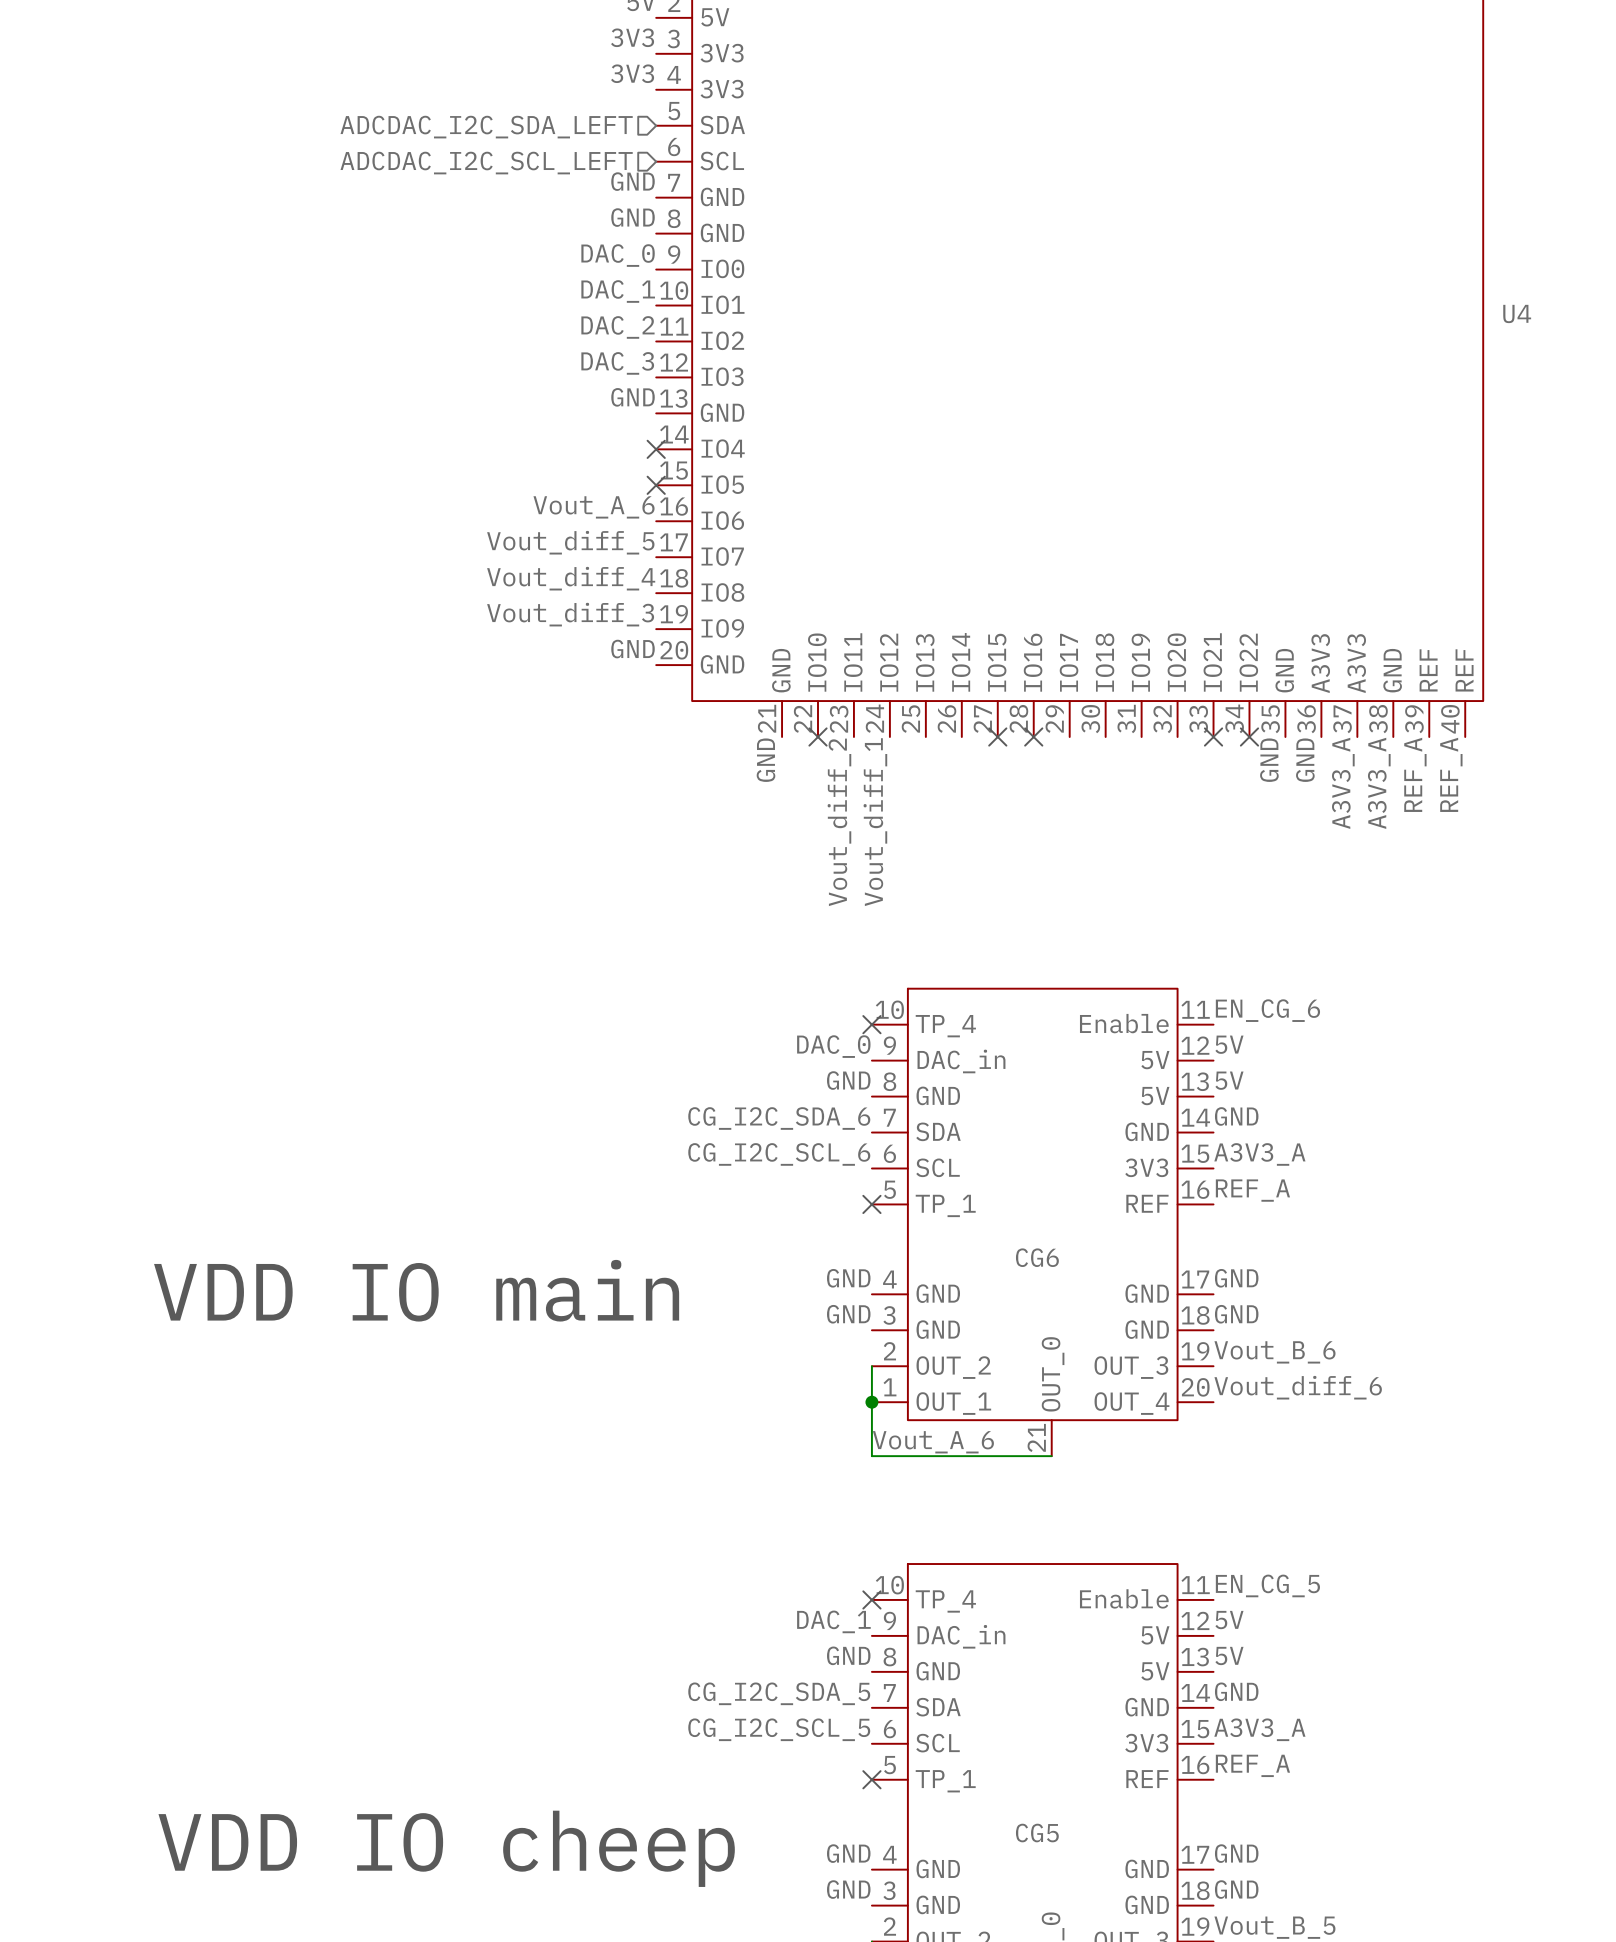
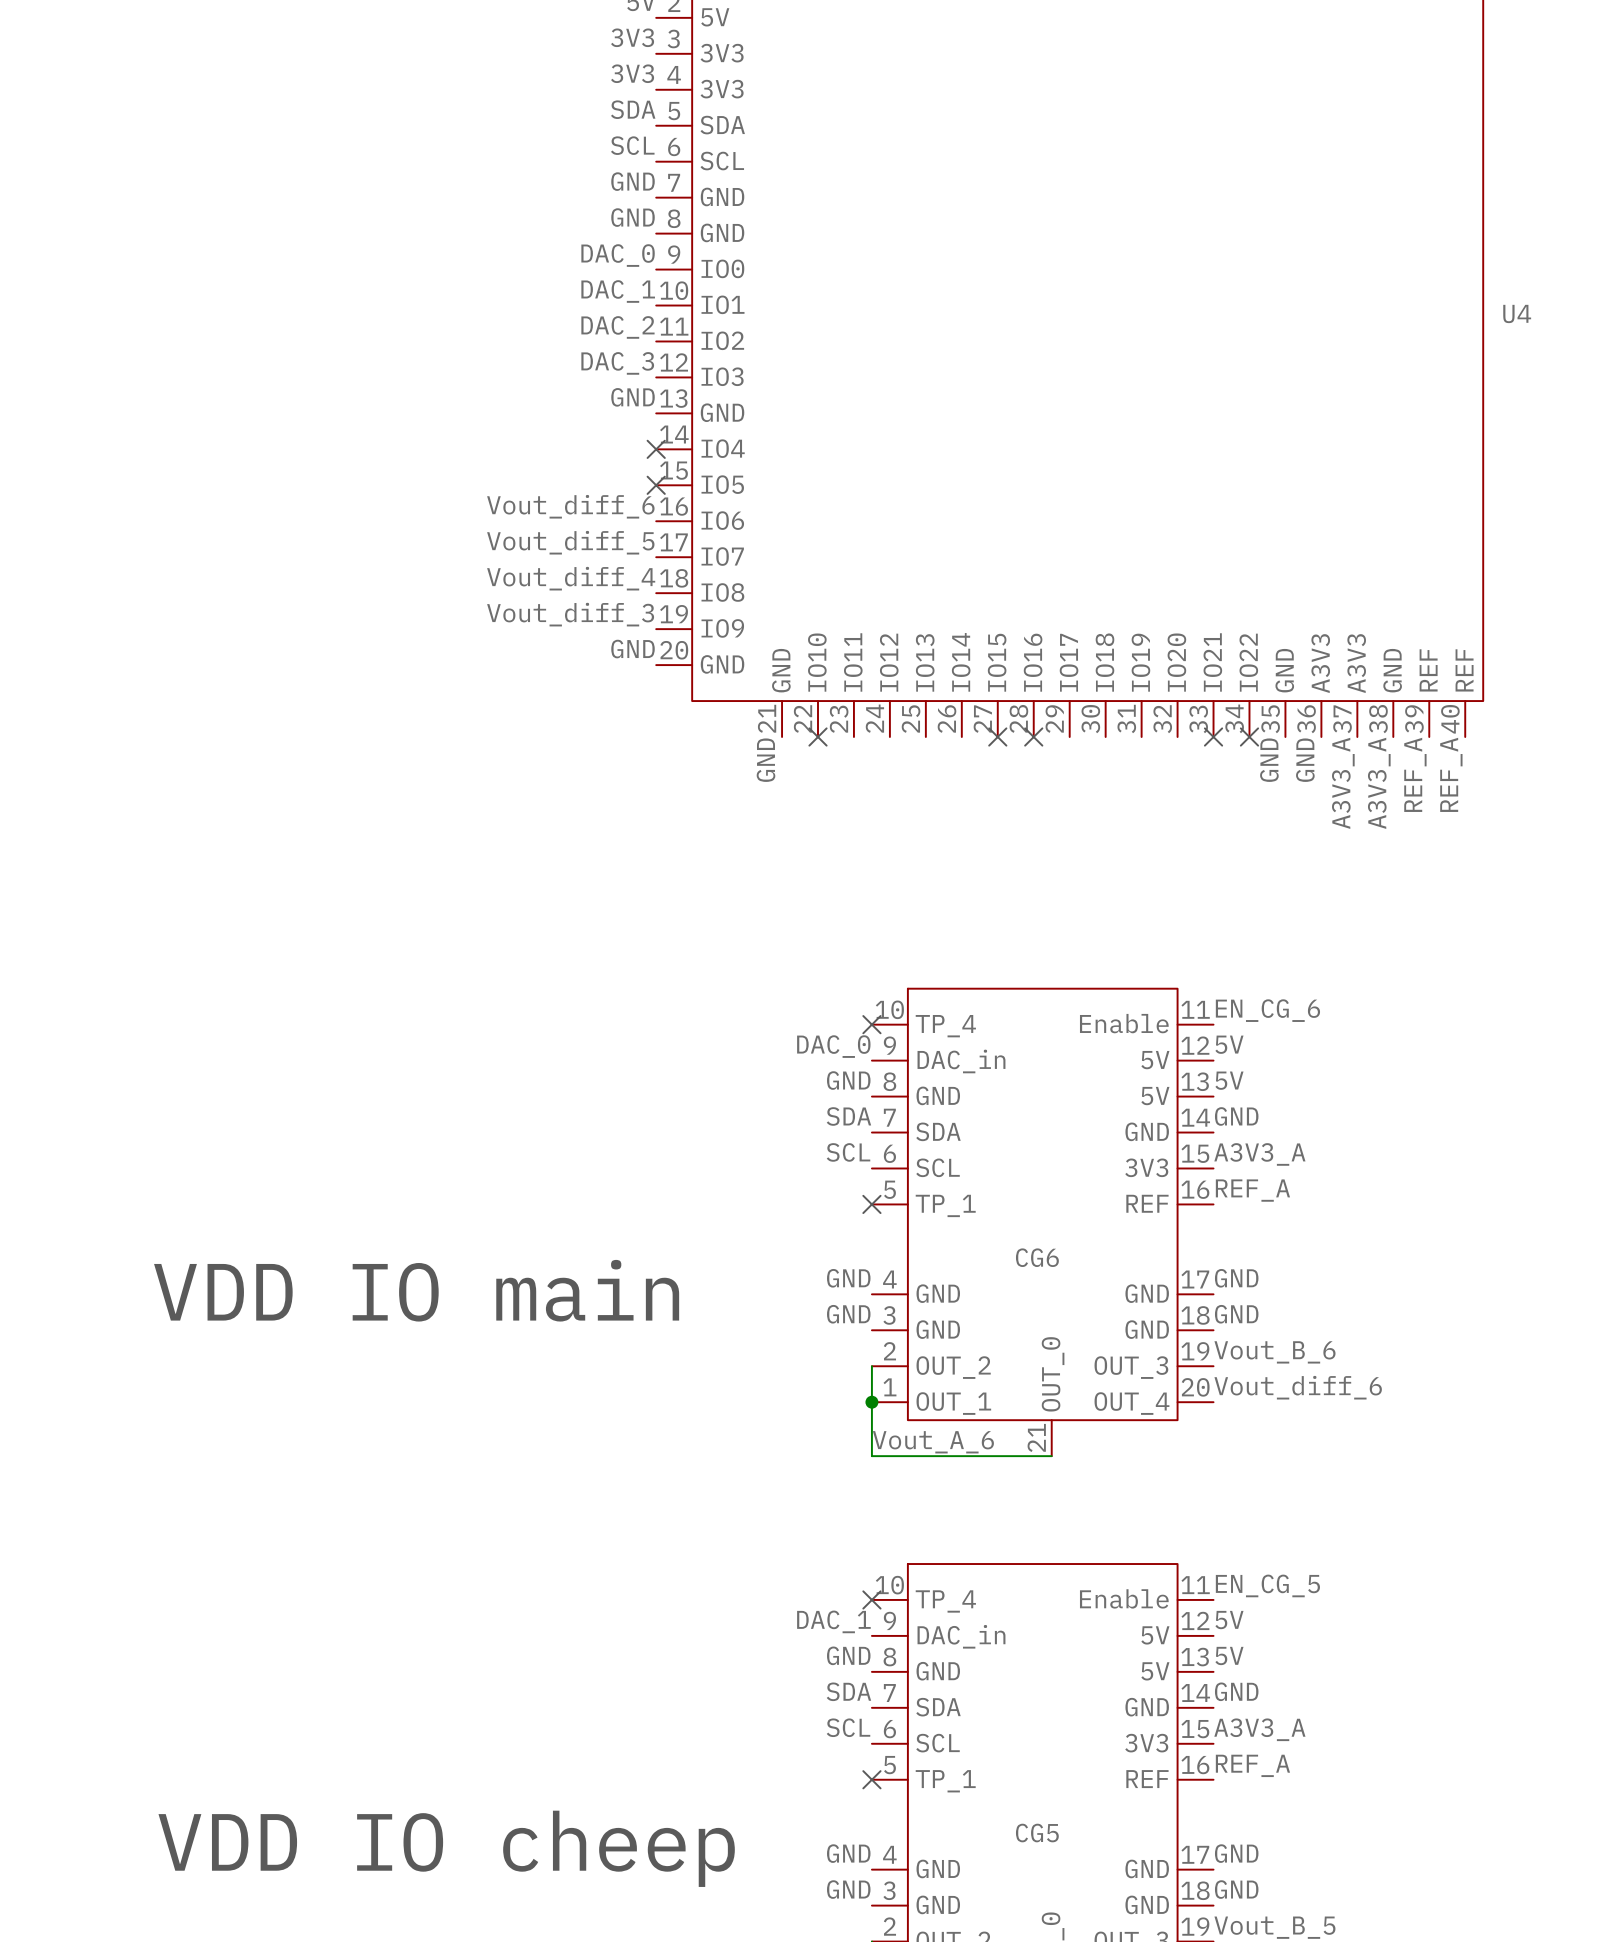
label: none -> SDA (633, 109)
hierarchical label: ADCDAC_I2C_SDA_LEFT (486, 127) -> none
label: none -> SCL (632, 145)
hierarchical label: ADCDAC_I2C_SCL_LEFT (486, 163) -> none
label: Vout_A_6 (594, 507) -> Vout_diff_6 (570, 506)
label: Vout_diff_2 (839, 822) -> none
label: Vout_diff_1 (875, 822) -> none
label: CG_I2C_SDA_6 (779, 1118) -> SDA (848, 1116)
label: CG_I2C_SCL_6 (779, 1154) -> SCL (848, 1152)
label: CG_I2C_SDA_5 (779, 1693) -> SDA (848, 1691)
label: CG_I2C_SCL_5 (779, 1729) -> SCL (848, 1727)

